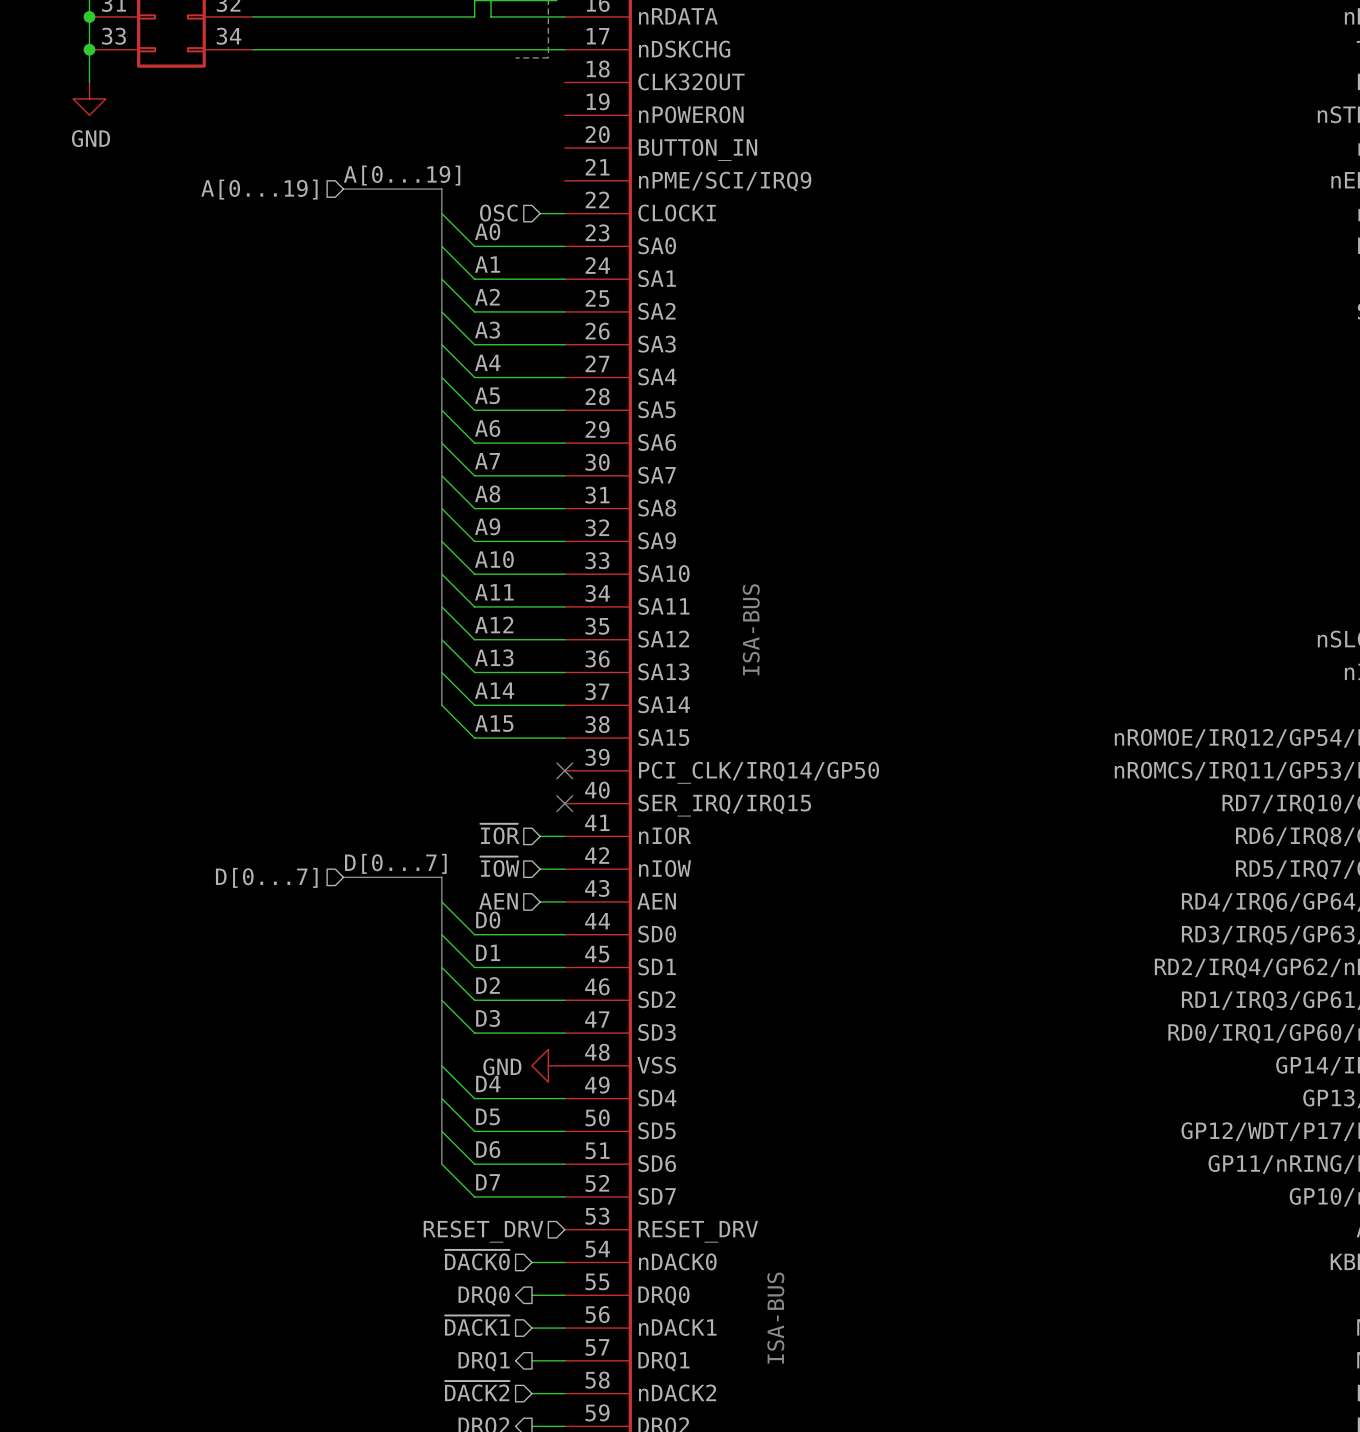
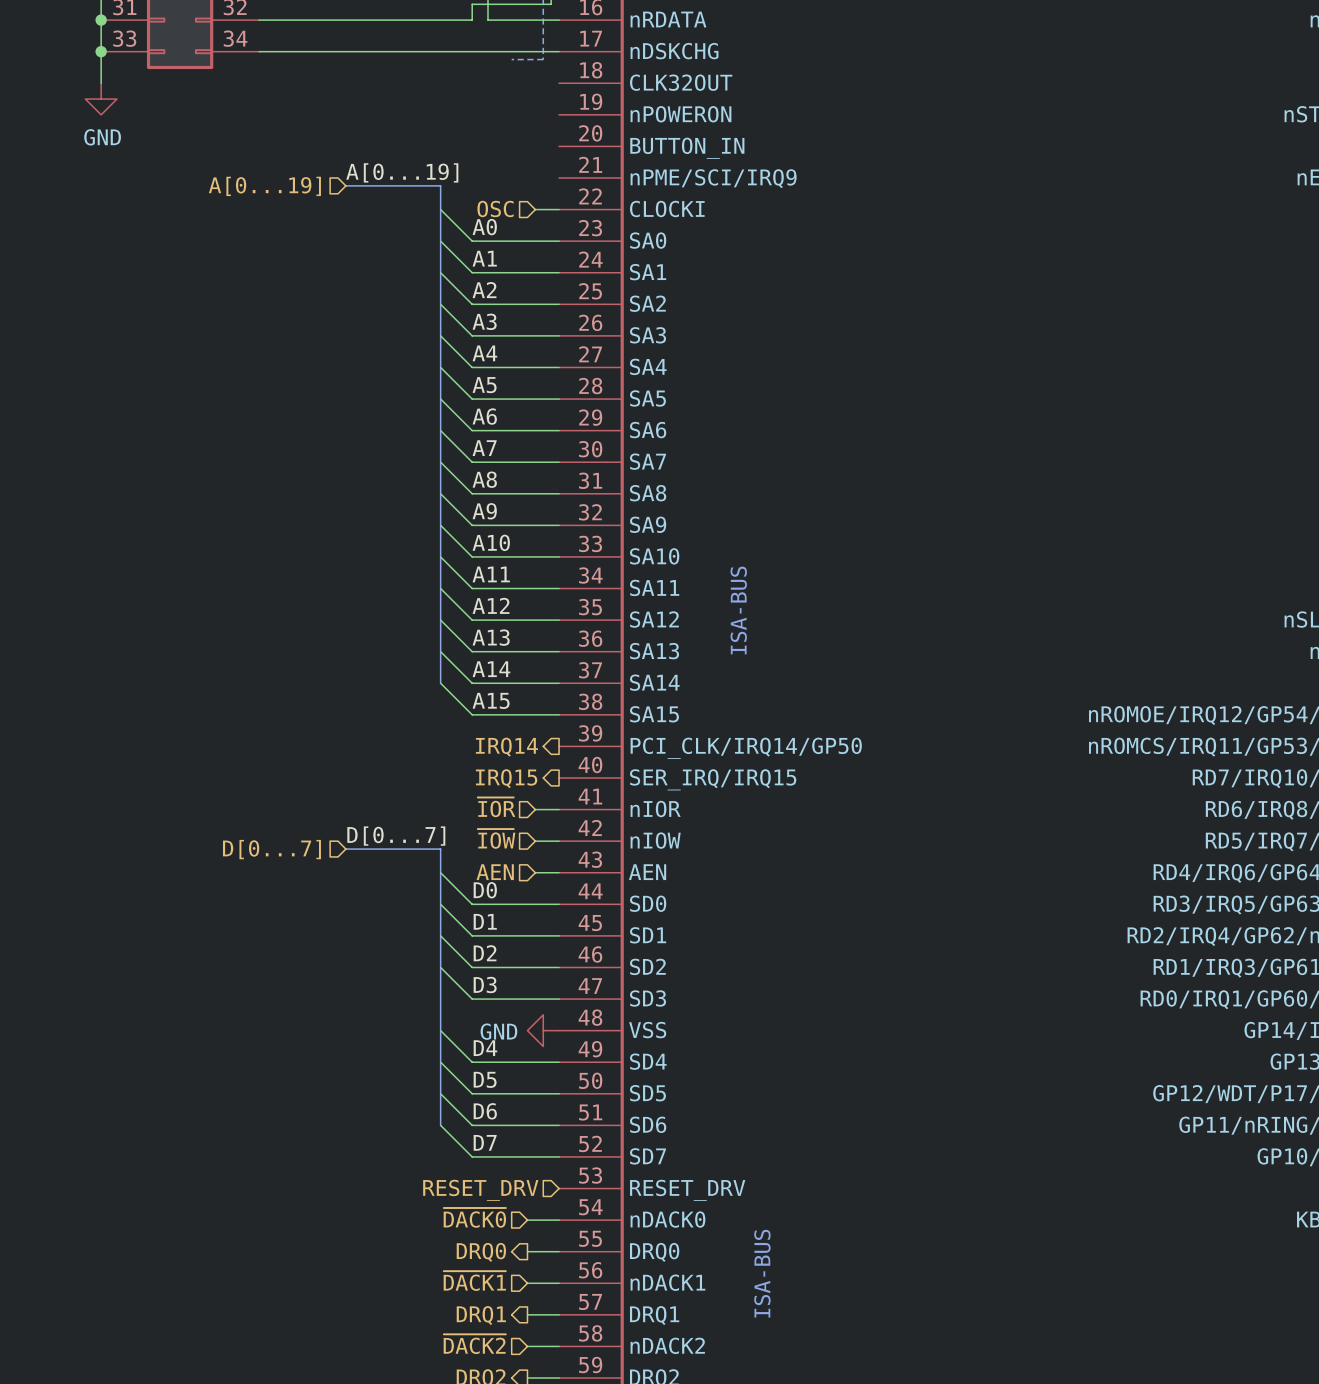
no-connect mark: (564, 770) -> none
hierarchical label: none -> IRQ14 (506, 747)
no-connect mark: (564, 803) -> none
hierarchical label: none -> IRQ15 (506, 778)

